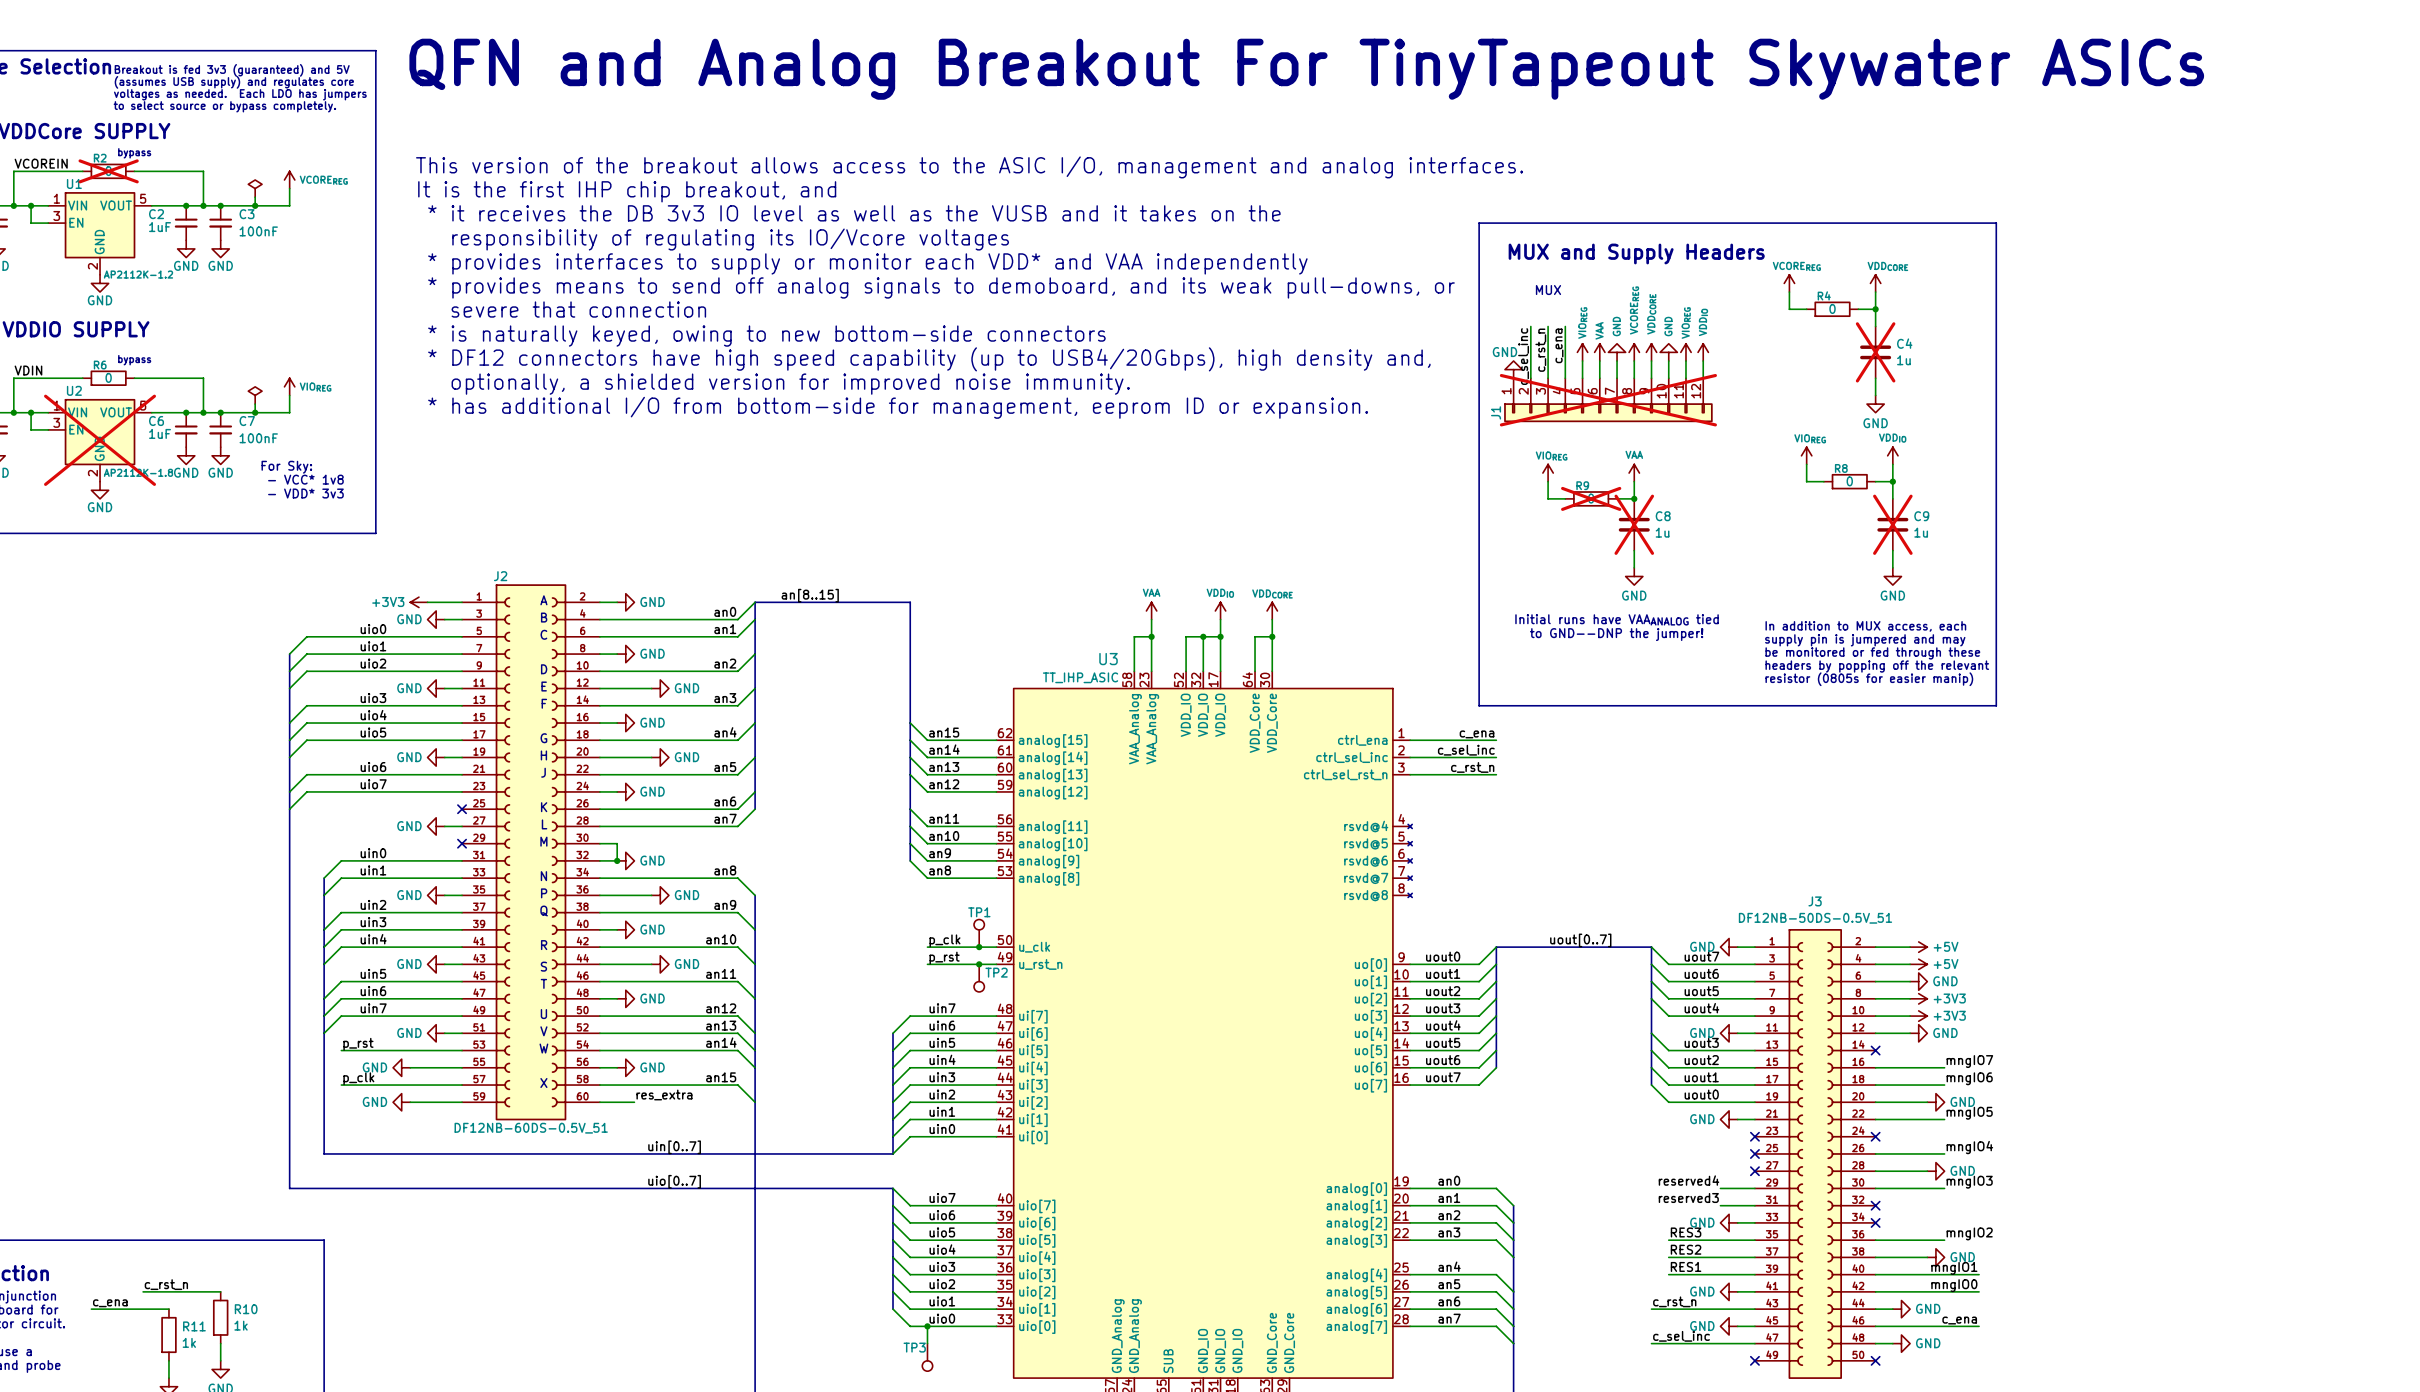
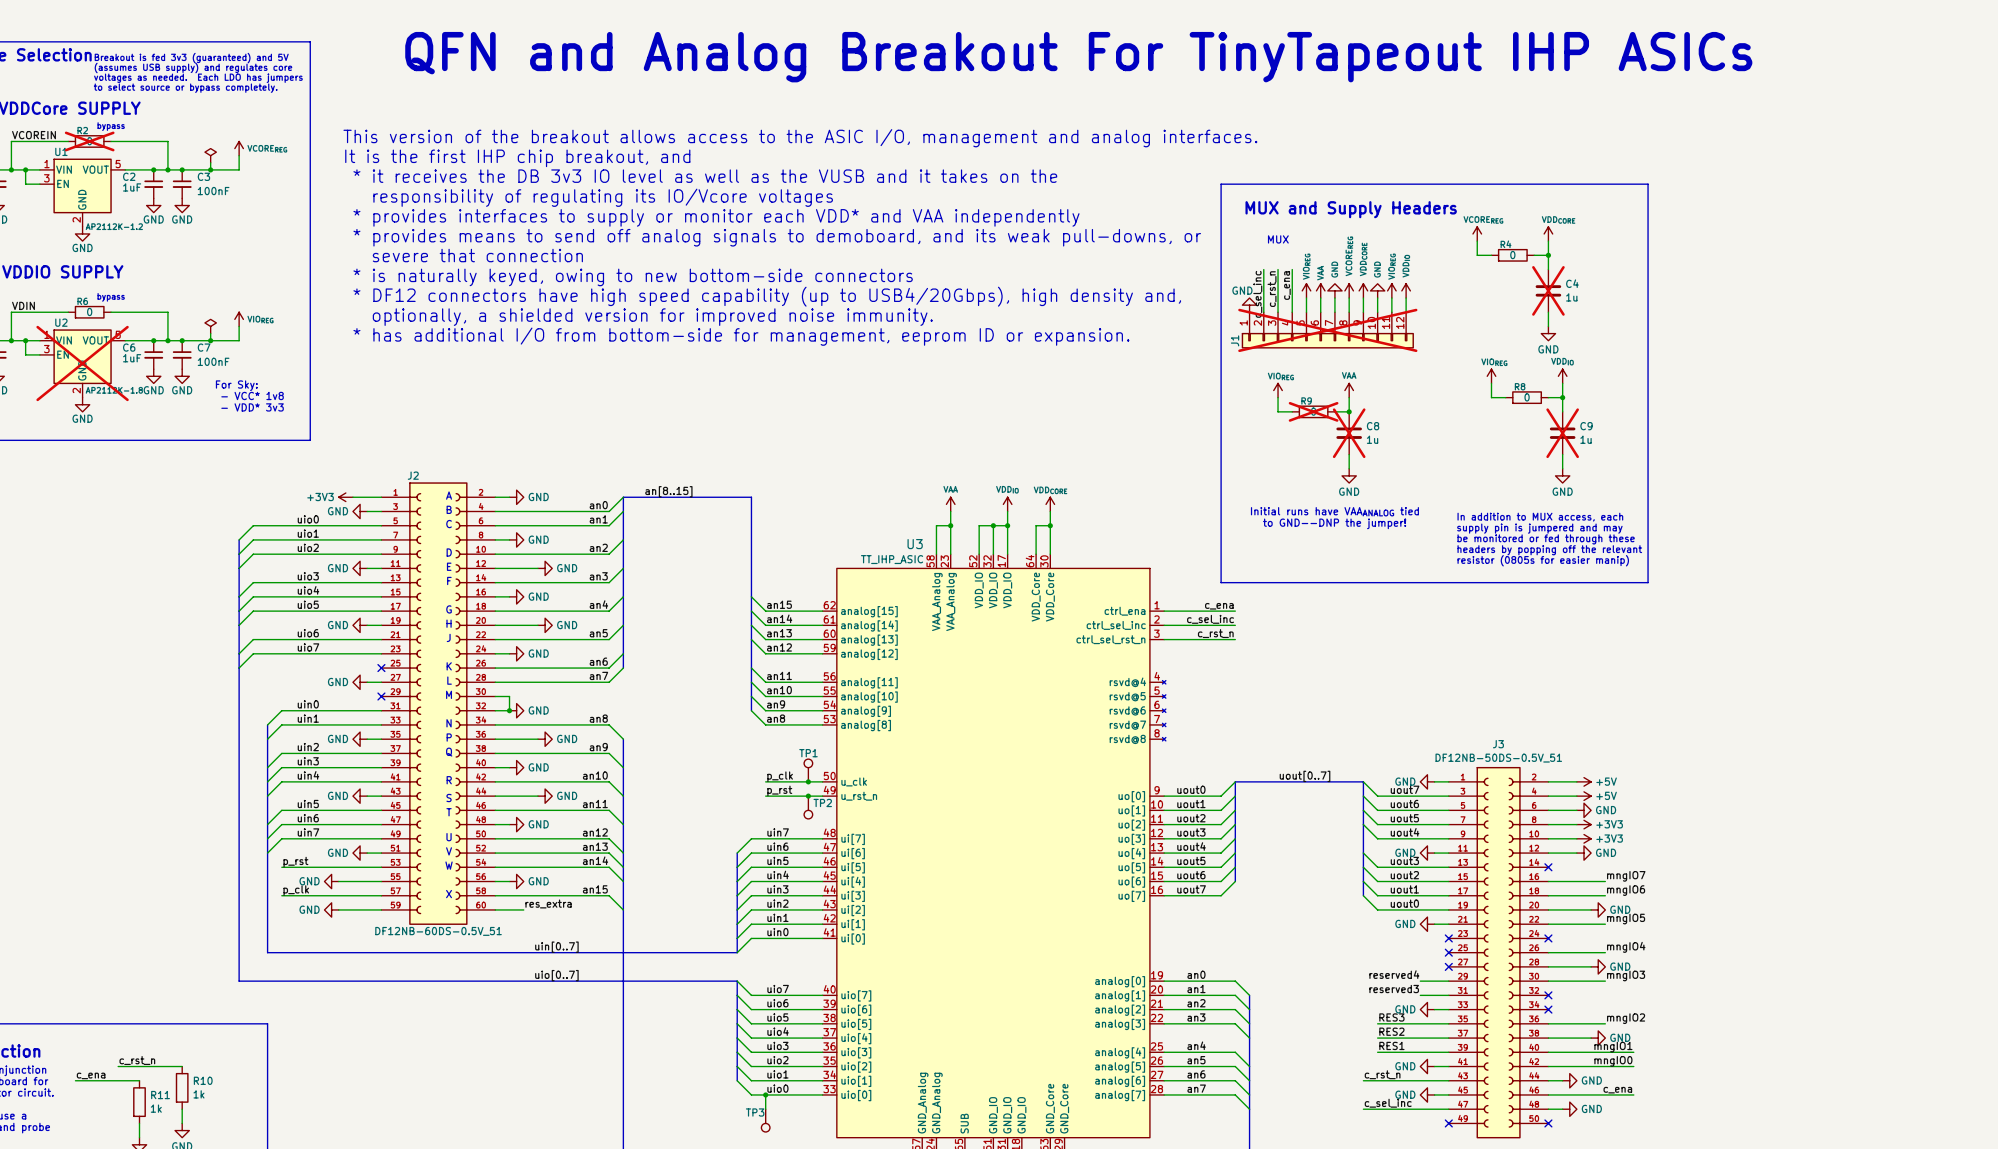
text: QFN and Analog Breakout For TinyTapeout Skywater ASICs (1306, 69) -> QFN and Analog Breakout For TinyTapeout IHP ASICs (1078, 57)

